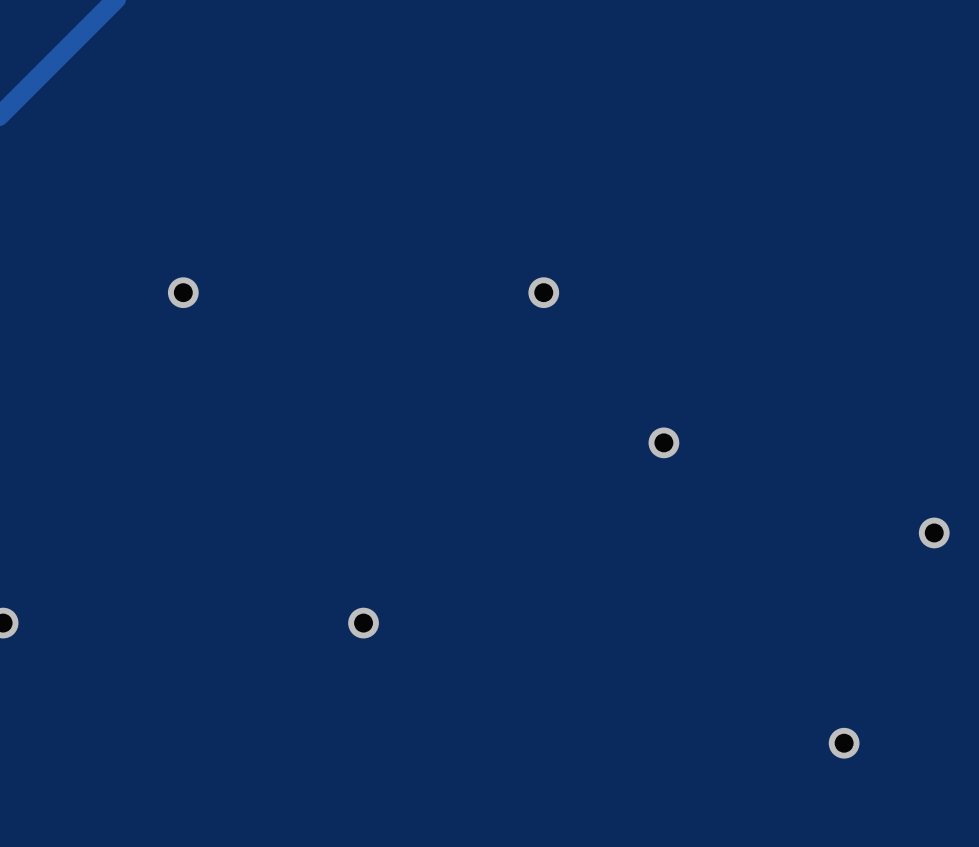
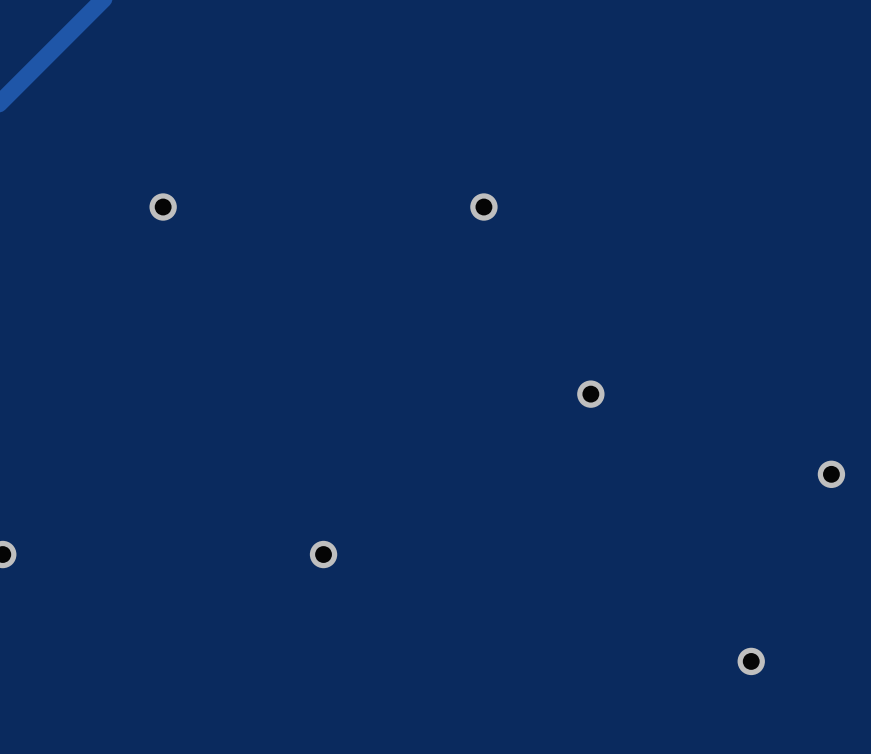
via position: (183, 292) -> (163, 207)
via position: (543, 292) -> (483, 207)

